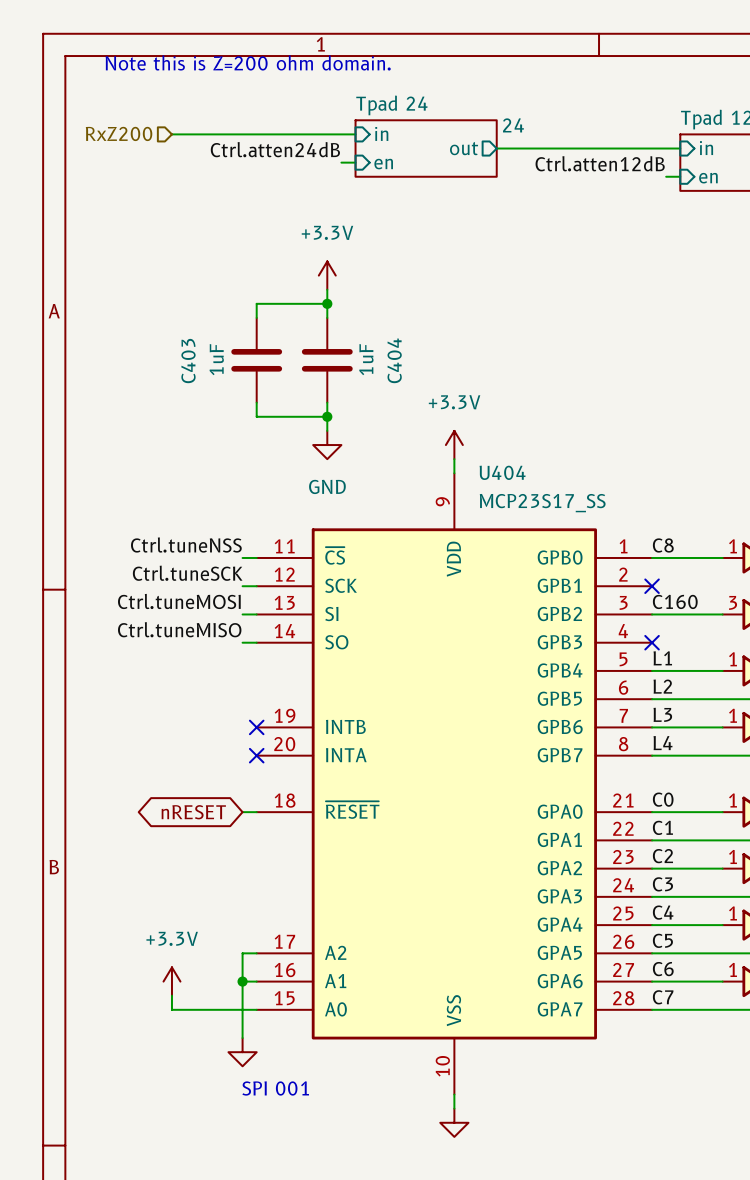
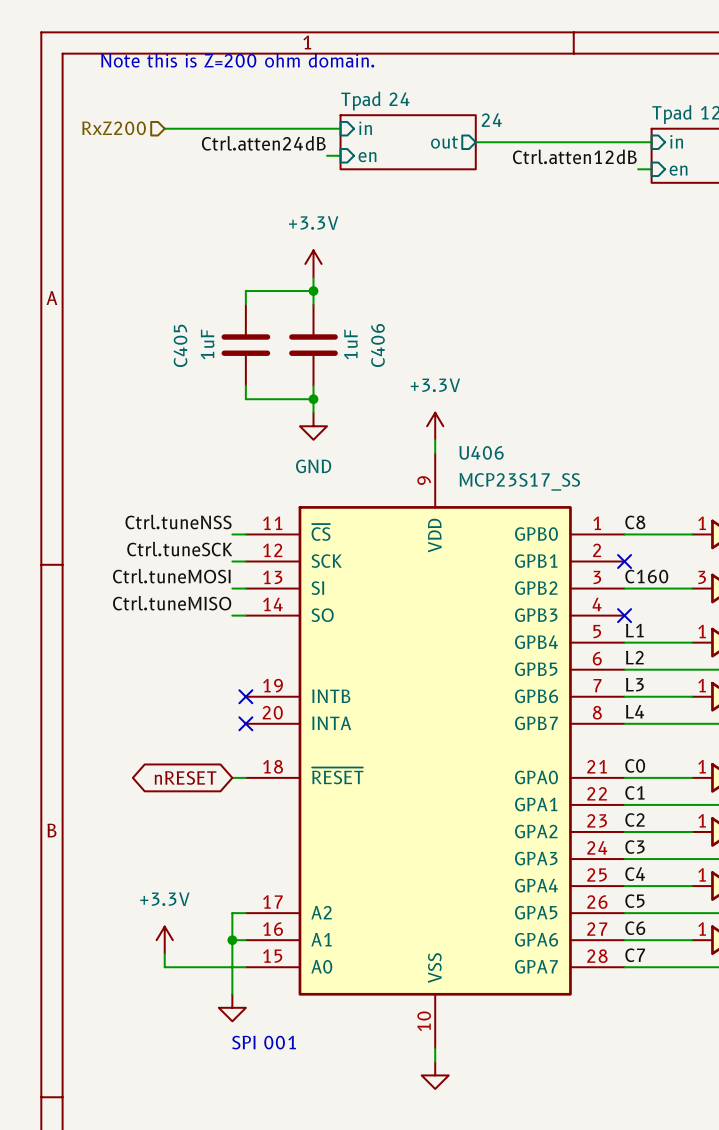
C404 name: C404 (394, 360) -> C406 (377, 345)
C403 name: C403 (188, 361) -> C405 (180, 345)
U404 name: U404 (502, 472) -> U406 (481, 452)

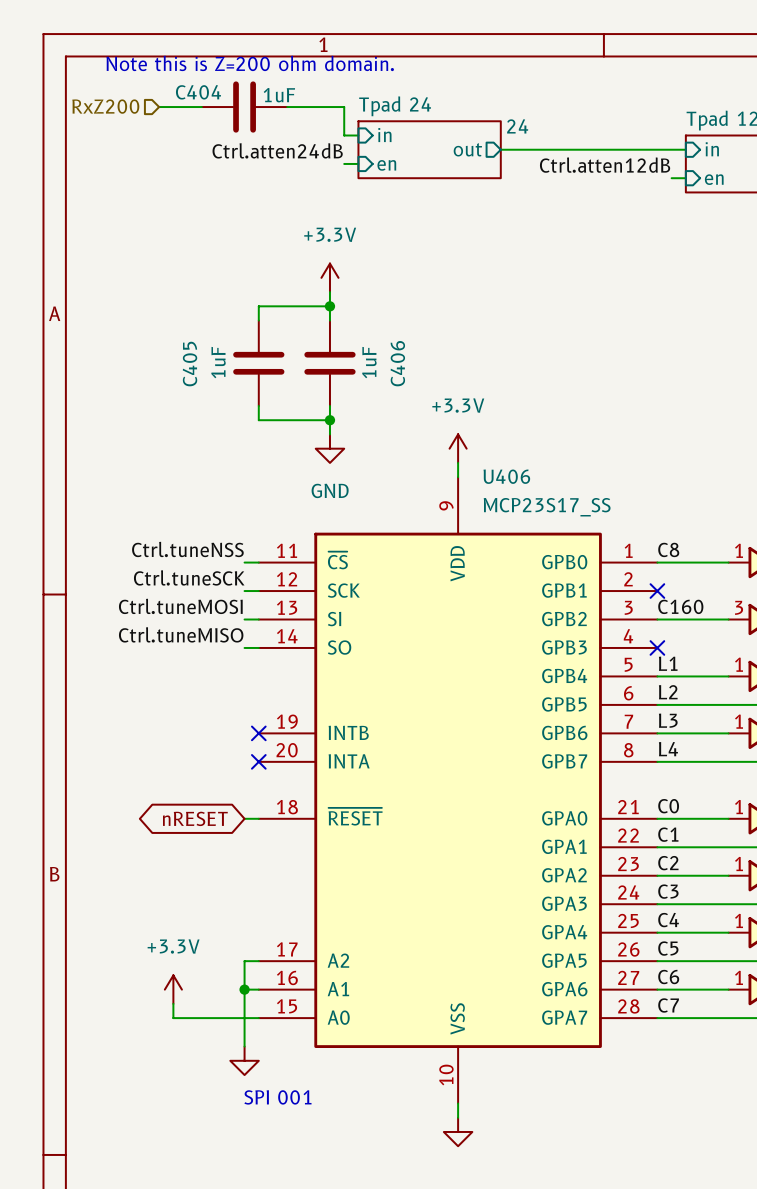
wire: none -> (159, 107) (201, 107)
C404: none -> 1uF (244, 107)
hierarchical label position: RxZ200 (114, 128) -> RxZ200 (105, 106)
wire: (164, 128) (327, 128) -> (287, 107) (344, 107) (344, 135)

